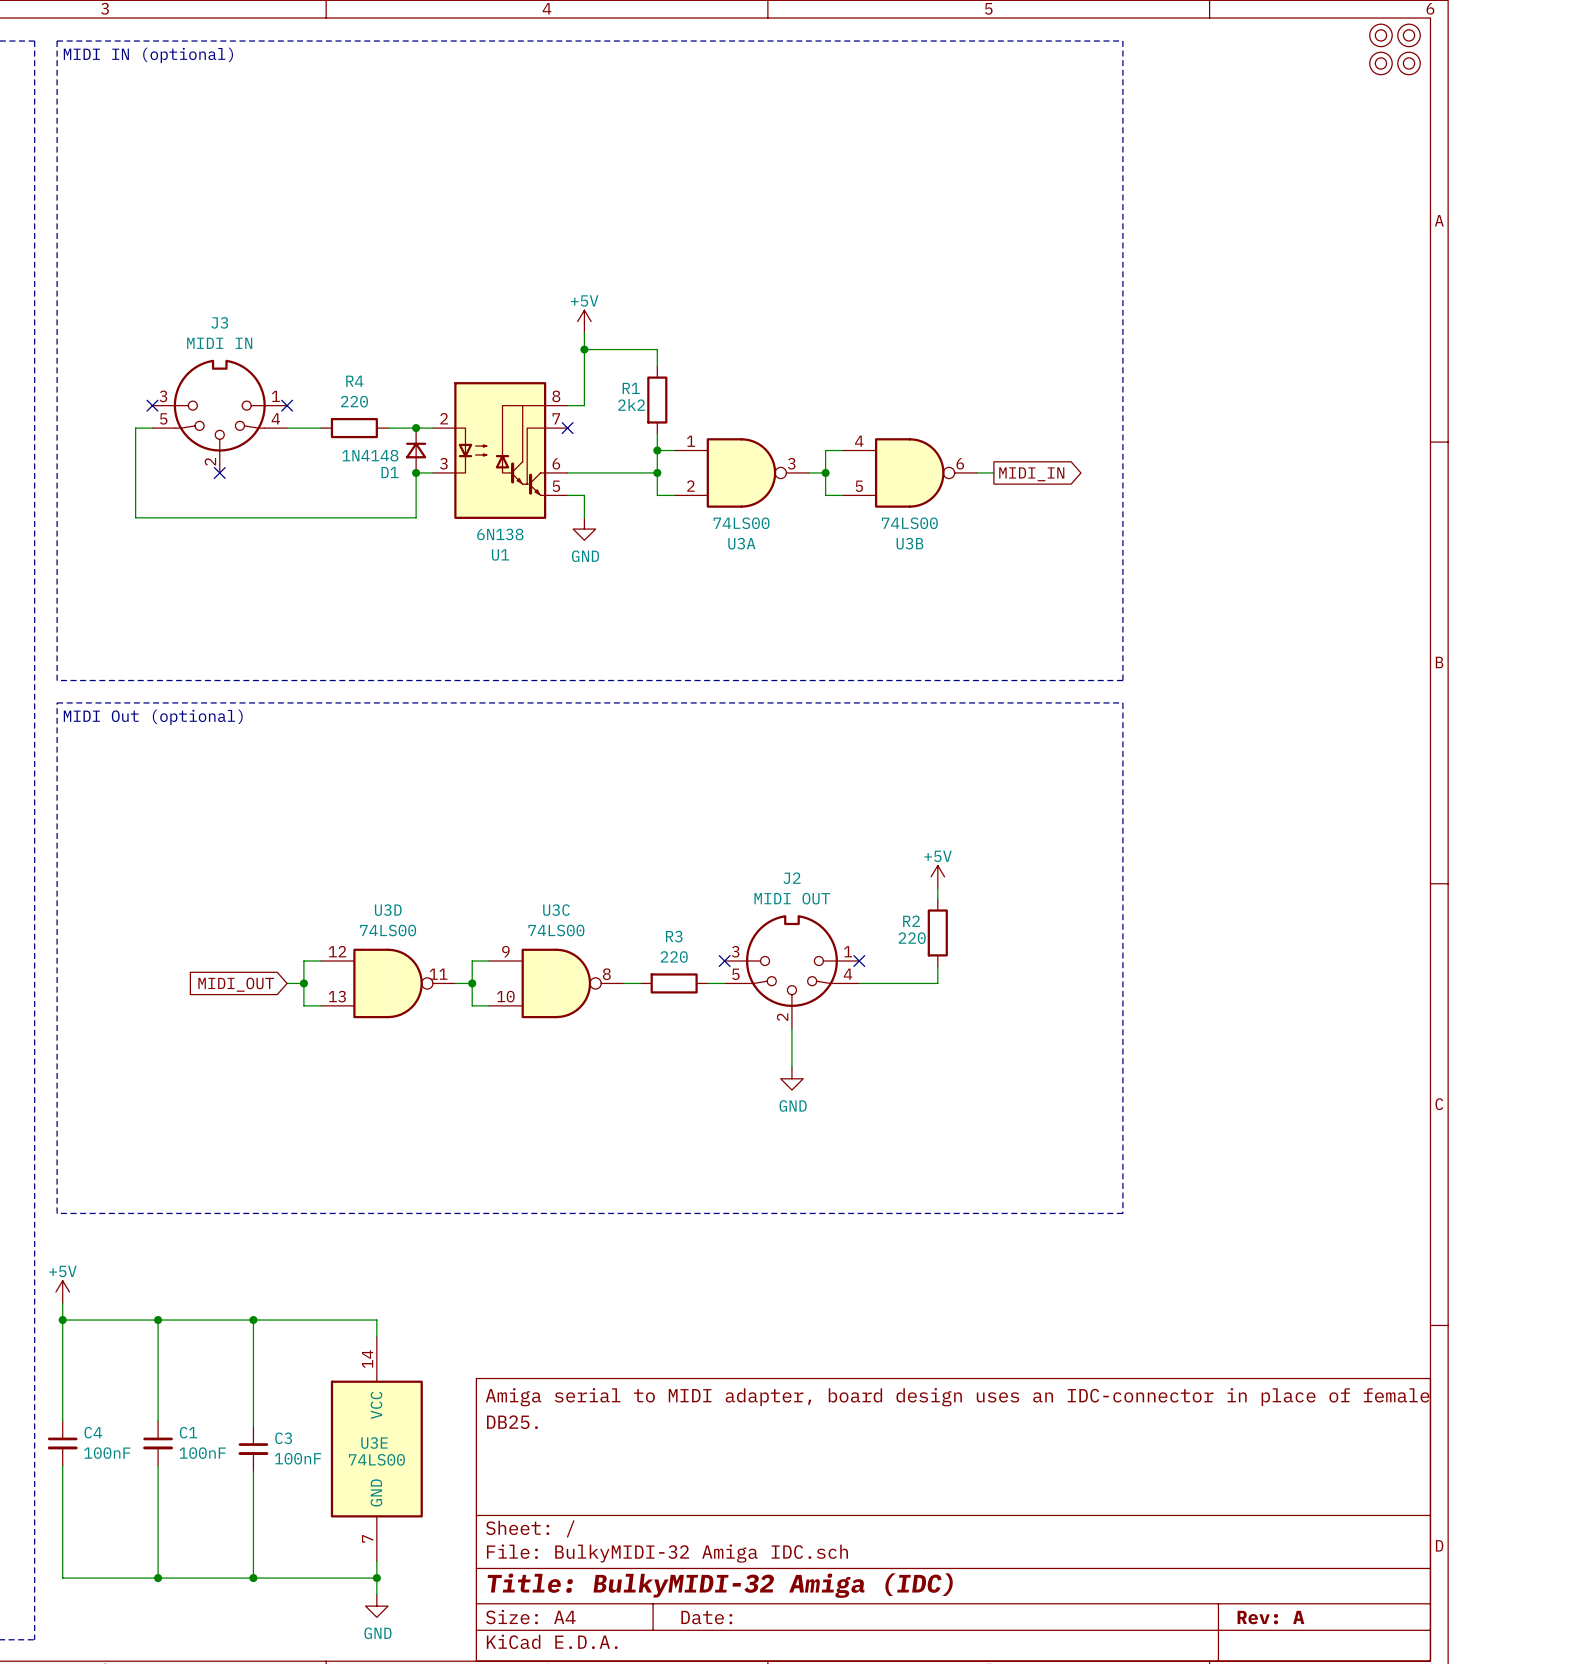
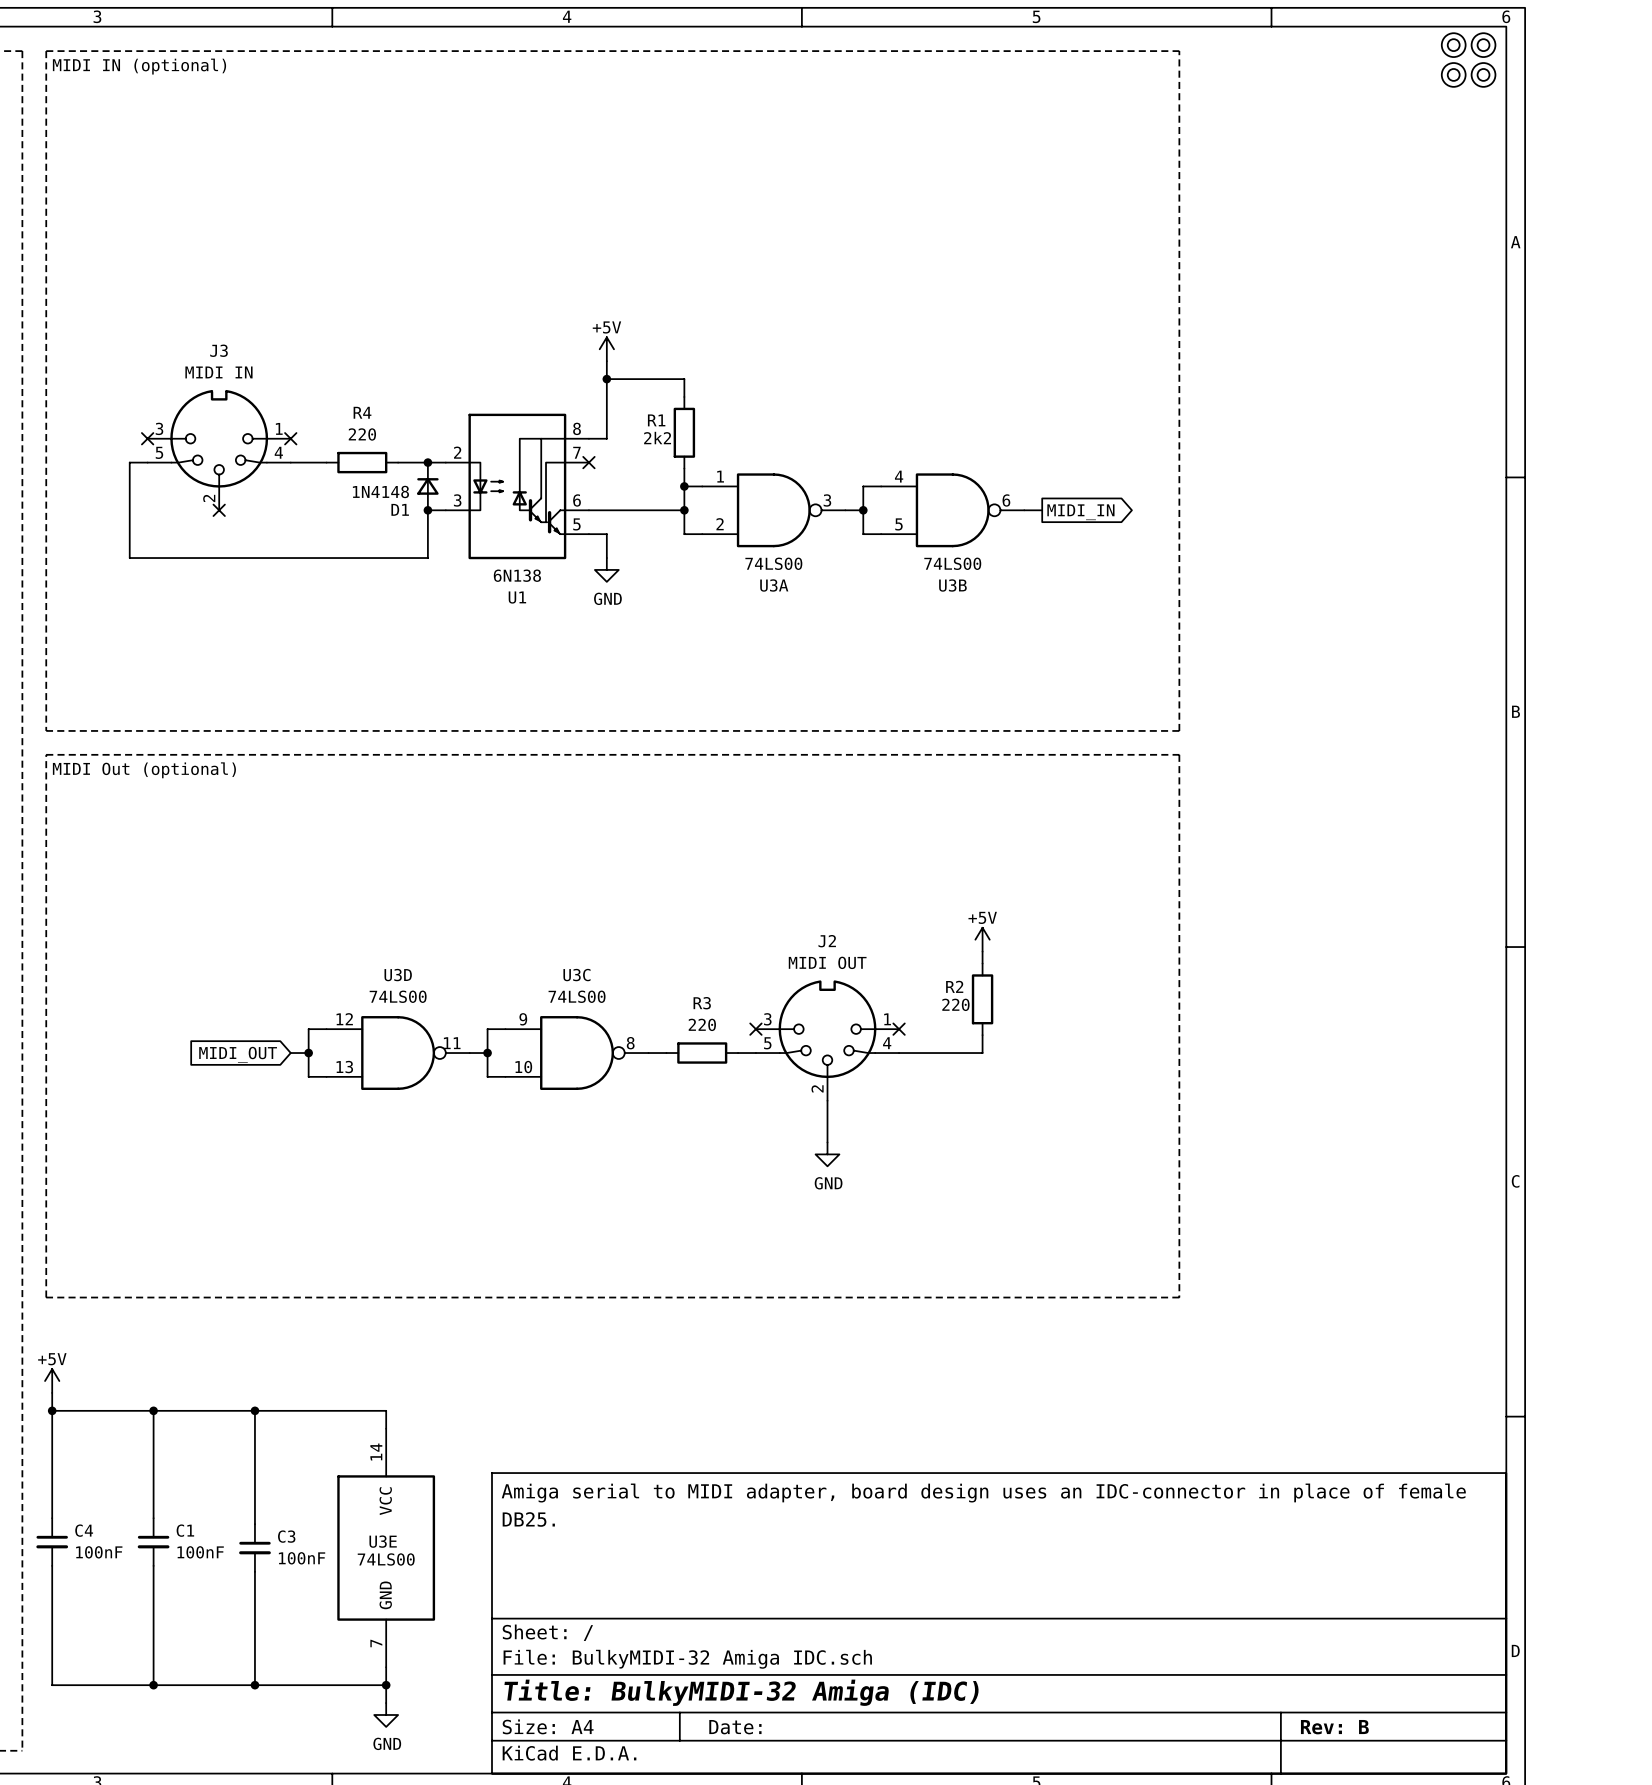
title block: Rev: A (1270, 1617) -> Rev: B (1334, 1727)

